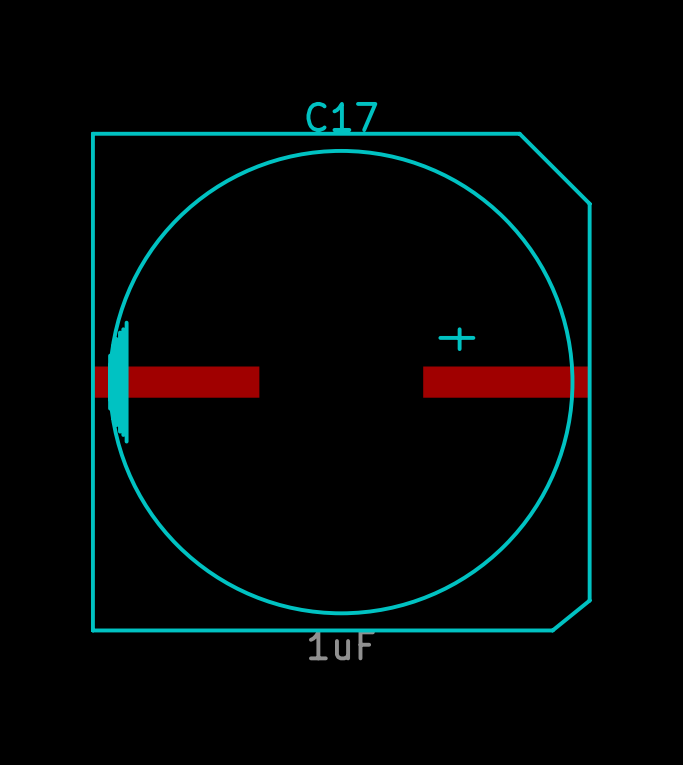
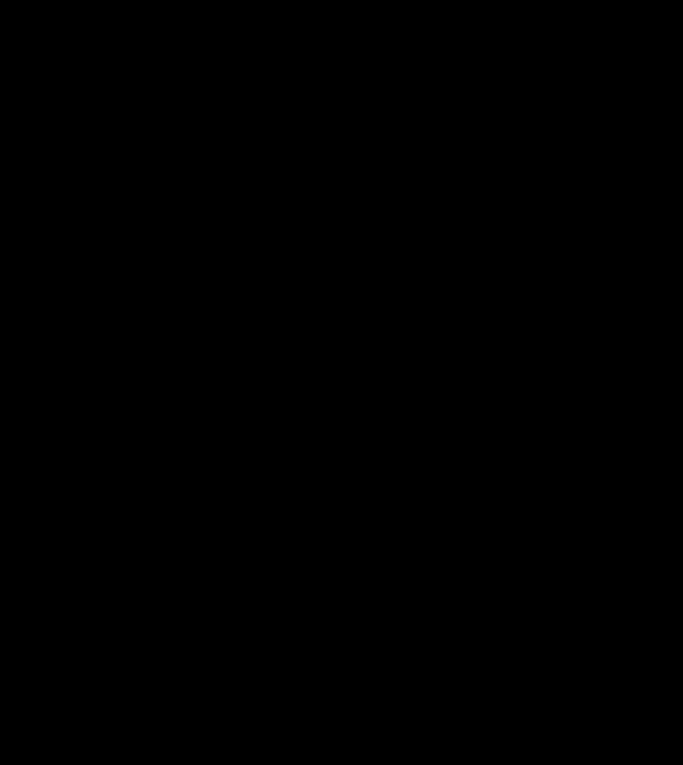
C17: 1uF (341, 382) -> none

